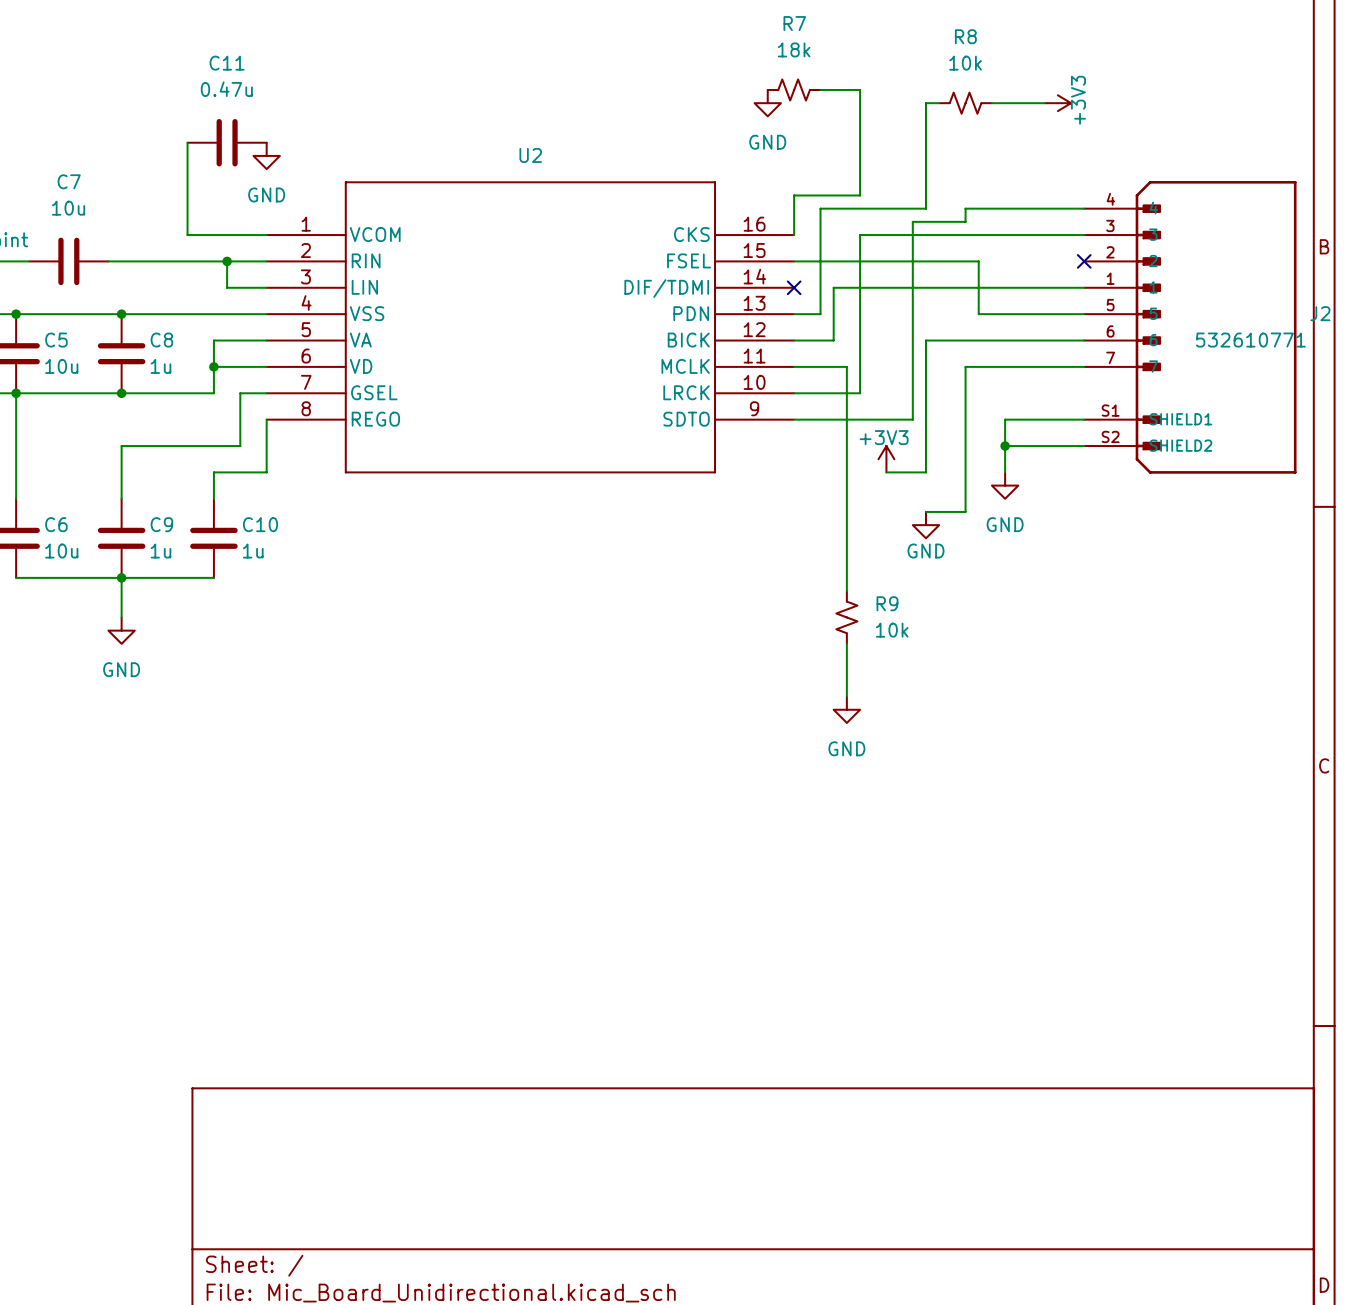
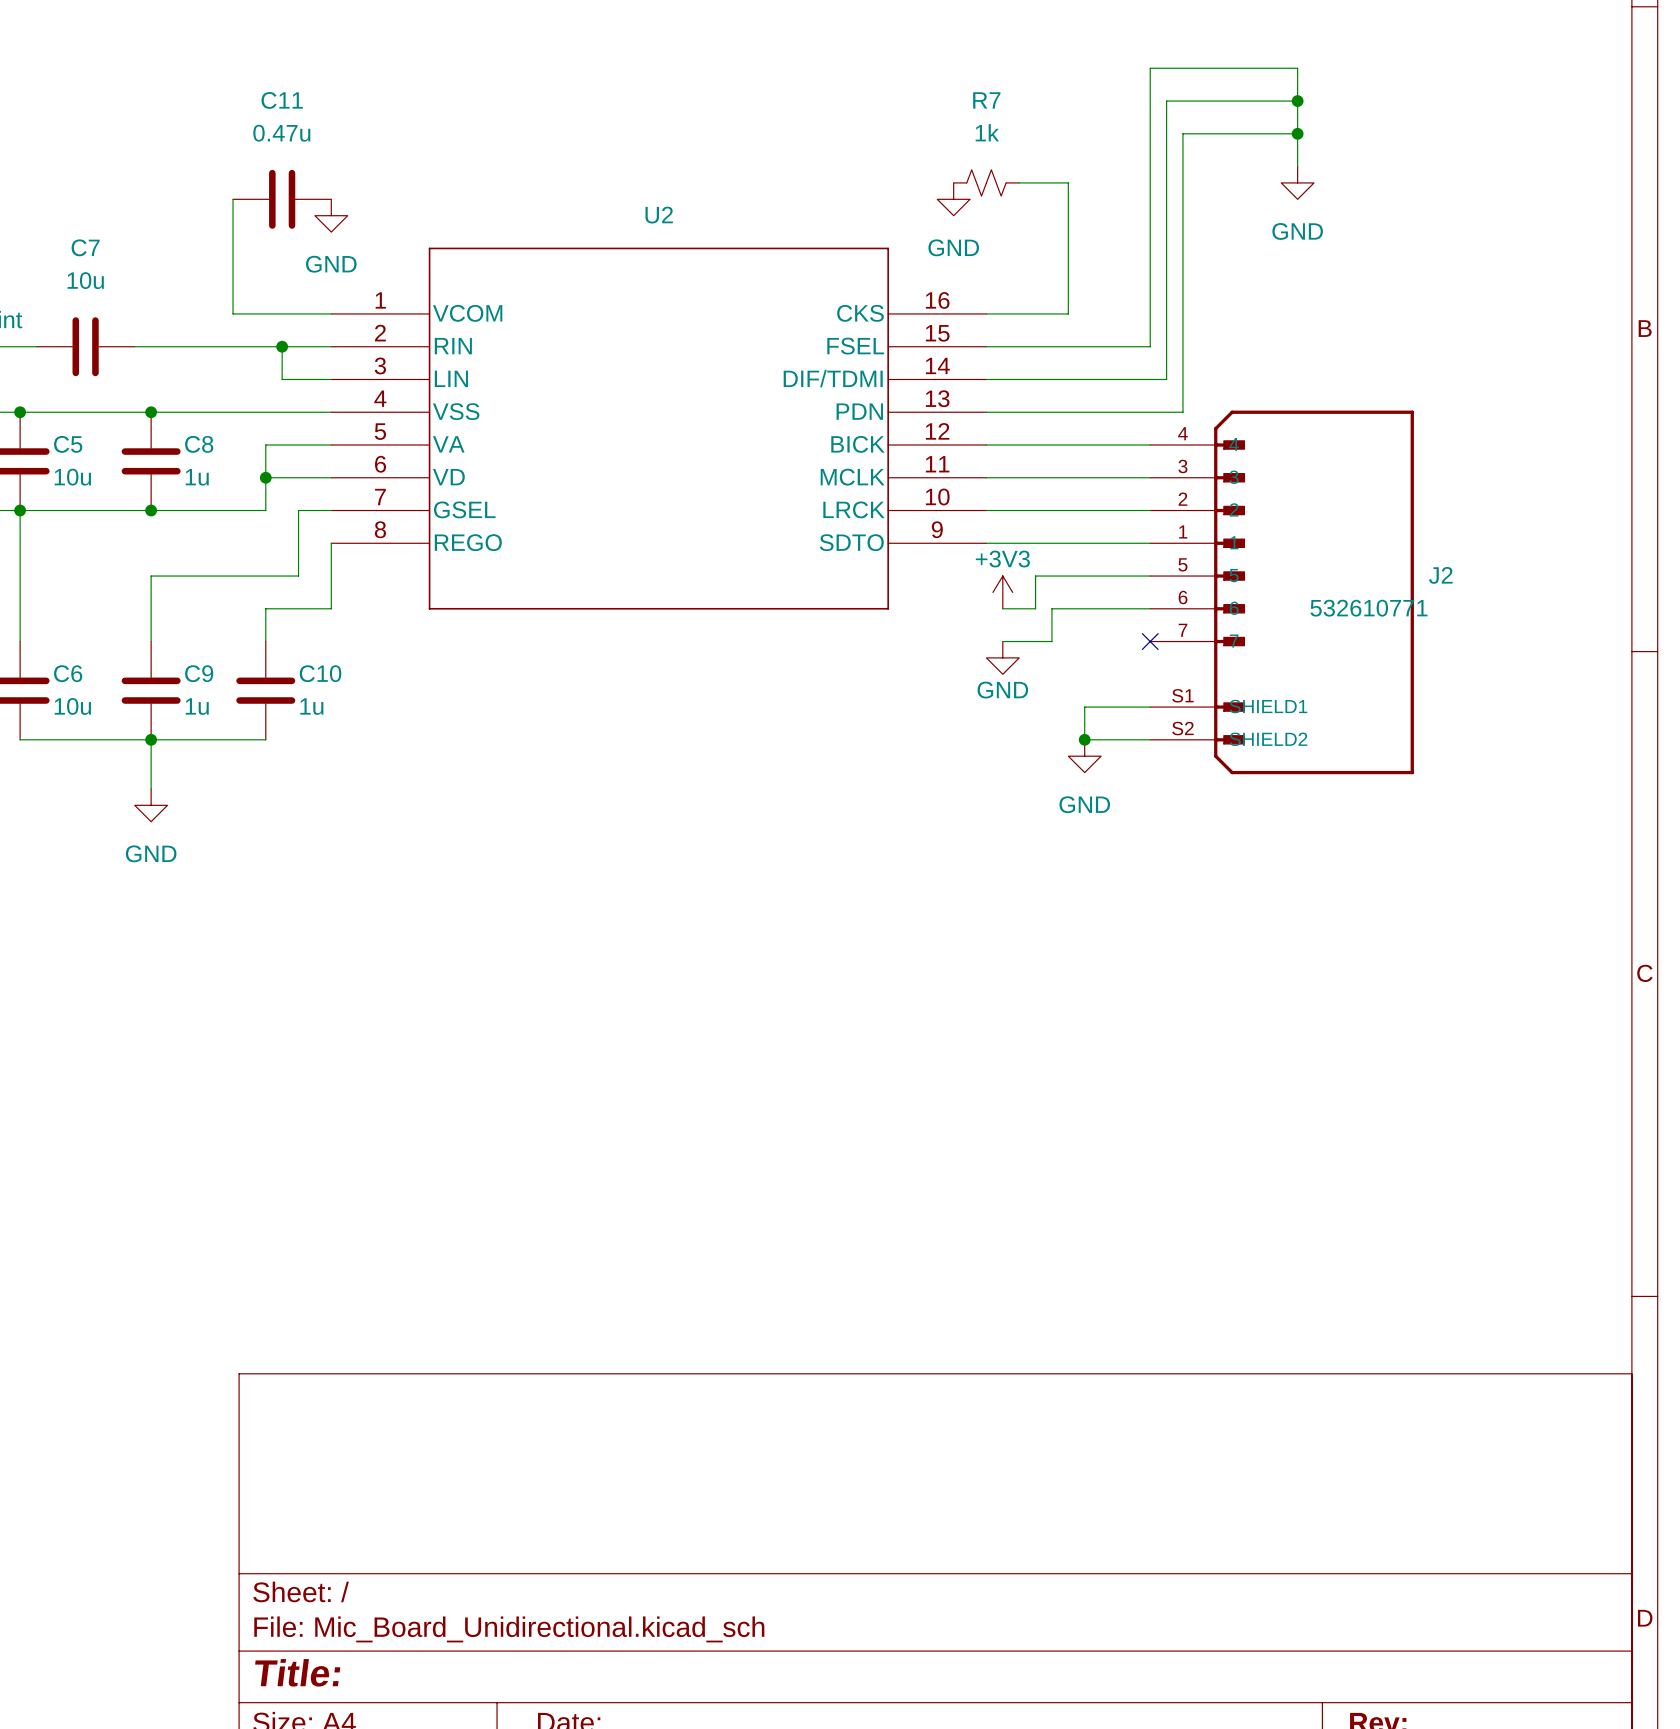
R7 value: 18k (794, 49) -> 1k (987, 132)
junction: none -> (1297, 101)
R7 position: (794, 89) -> (986, 182)
wire: (820, 89) (860, 89) (860, 129) -> (1019, 182) (1068, 182)
wire: none -> (1297, 133) (1182, 133) (1182, 412) (1019, 412)
junction: none -> (1297, 133)
power symbol position: GND (767, 103) -> GND (953, 199)
wire: (926, 103) (939, 103) -> (1150, 150) (1150, 68) (1297, 68) (1297, 166)
R8: 10k (965, 103) -> none
wire: (991, 103) (1044, 103) -> none
power symbol: +3V3 (1057, 103) -> none
power symbol: none -> GND (1297, 182)
wire: (860, 195) (794, 195) (794, 235) -> (1068, 264) (1068, 313) (986, 313)
wire: (926, 208) (820, 208) (820, 314) -> (1150, 281) (1150, 346)
wire: (1084, 208) (965, 208) (965, 221) (912, 221) (912, 419) -> (1150, 543) (1133, 543)
wire: (1084, 235) (860, 235) (860, 393) -> (1150, 510) (1068, 510)
wire: (926, 261) (978, 261) (978, 314) (1084, 314) -> none
no-connect mark: (1084, 261) -> none
no-connect mark: (794, 287) -> none
wire: (833, 287) (833, 340) -> (1035, 379) (986, 379)
wire: (939, 287) (1084, 287) -> (1166, 379) (1166, 101) (1297, 101)
J2 position: (1190, 327) -> (1282, 592)
wire: none -> (1035, 445) (1150, 445)
wire: (1084, 340) (926, 340) (926, 472) -> none
wire: (846, 366) (846, 472) -> (1101, 608) (1051, 608)
wire: (1084, 366) (965, 366) (965, 511) (926, 511) -> none
wire: (1084, 419) (1005, 419) (1005, 472) -> none
power symbol text position: +3V3 (884, 437) -> +3V3 (1002, 559)
wire: none -> (1150, 576) (1035, 576) (1035, 608) (1002, 608)
wire: (1005, 446) (1084, 446) -> (1051, 477) (1150, 477)
junction: (1005, 446) -> none
power symbol position: +3V3 (886, 459) -> +3V3 (1002, 592)
power symbol: GND (1005, 485) -> none
wire: (846, 498) (846, 591) -> (1051, 641) (1002, 641)
no-connect mark: none -> (1150, 641)
power symbol: none -> GND (1002, 657)
power symbol: GND (926, 525) -> none
wire: none -> (1150, 707) (1084, 707) (1084, 739) (1150, 739)
junction: none -> (1084, 739)
power symbol: none -> GND (1084, 756)
R9: 10k (846, 617) -> none
wire: (846, 643) (846, 696) -> none
power symbol: GND (846, 709) -> none

